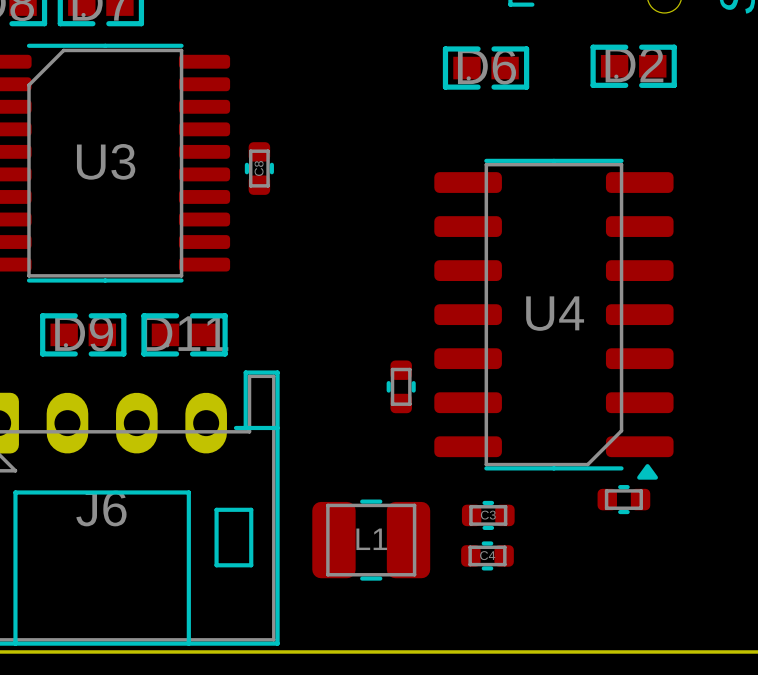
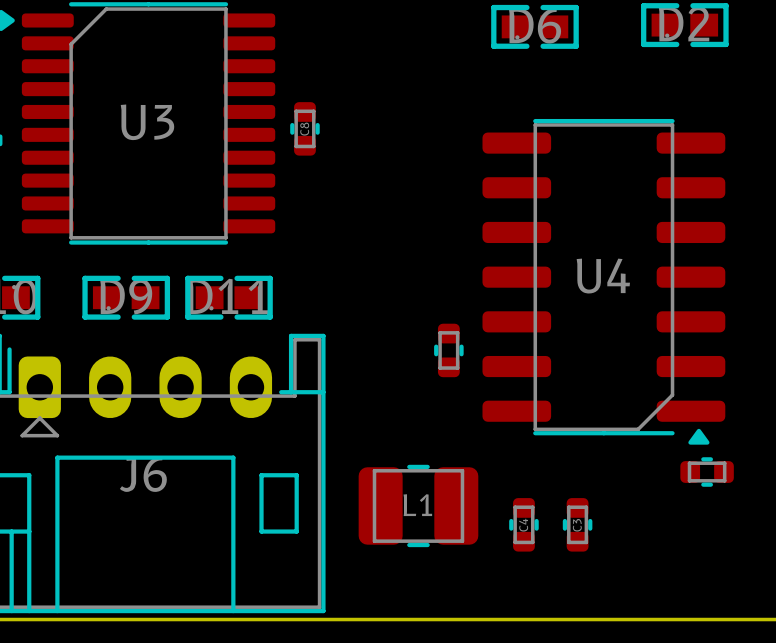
part position: (623, 499) -> (707, 472)
C3 rotation: 0° (488, 515) -> 90° clockwise (577, 524)
C3 position: (488, 515) -> (577, 524)
C4 rotation: 0° (487, 555) -> 90° clockwise (523, 524)

